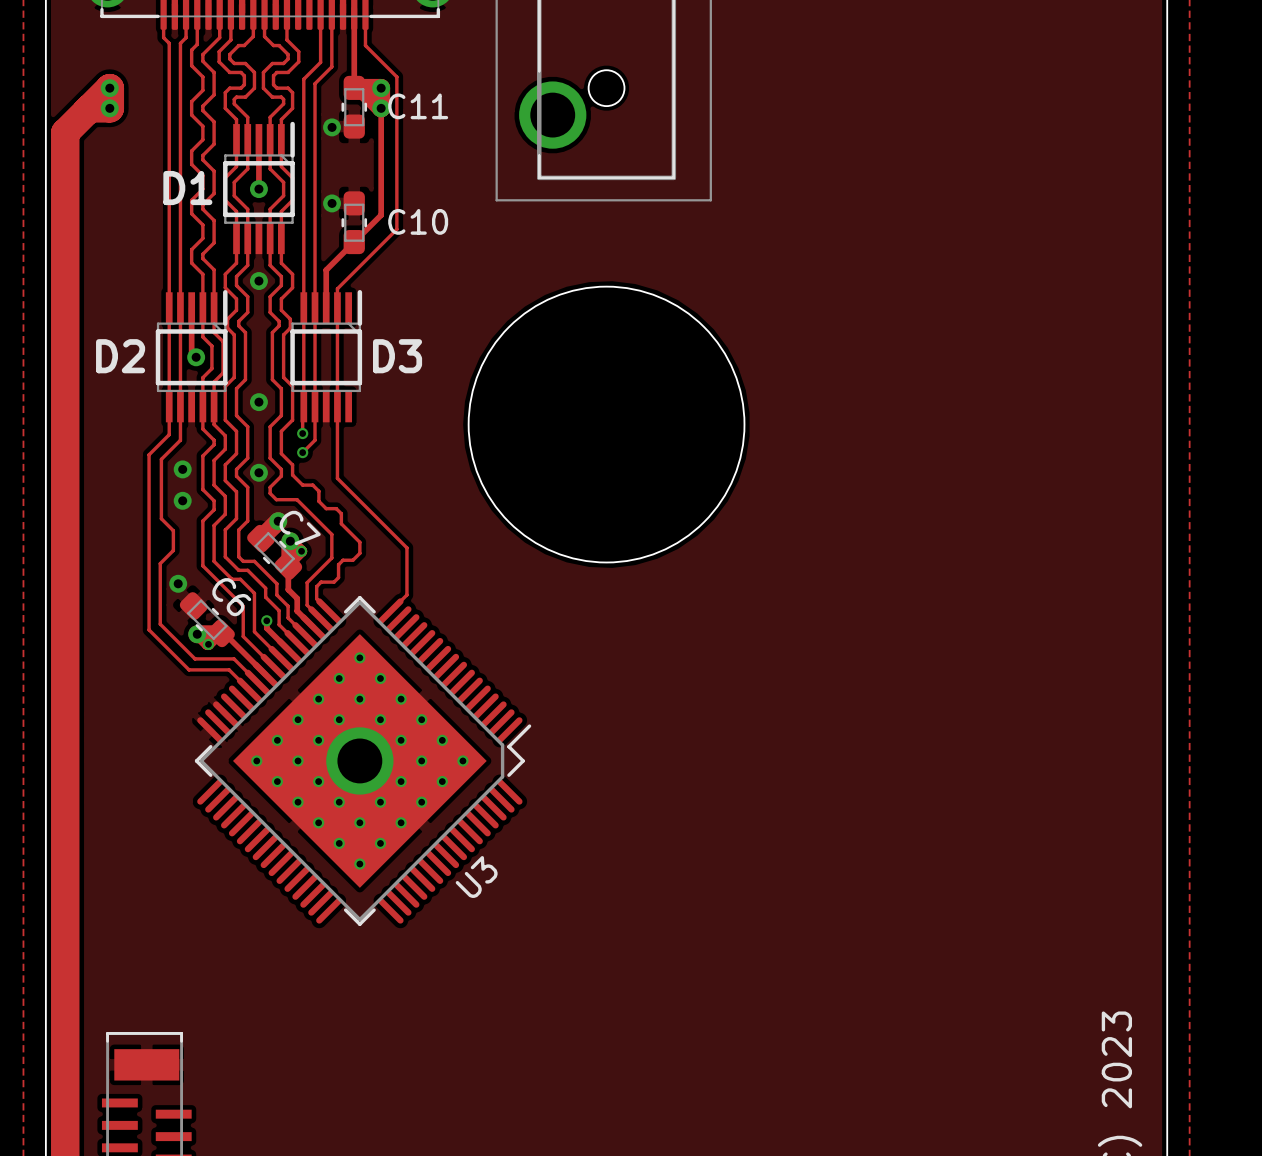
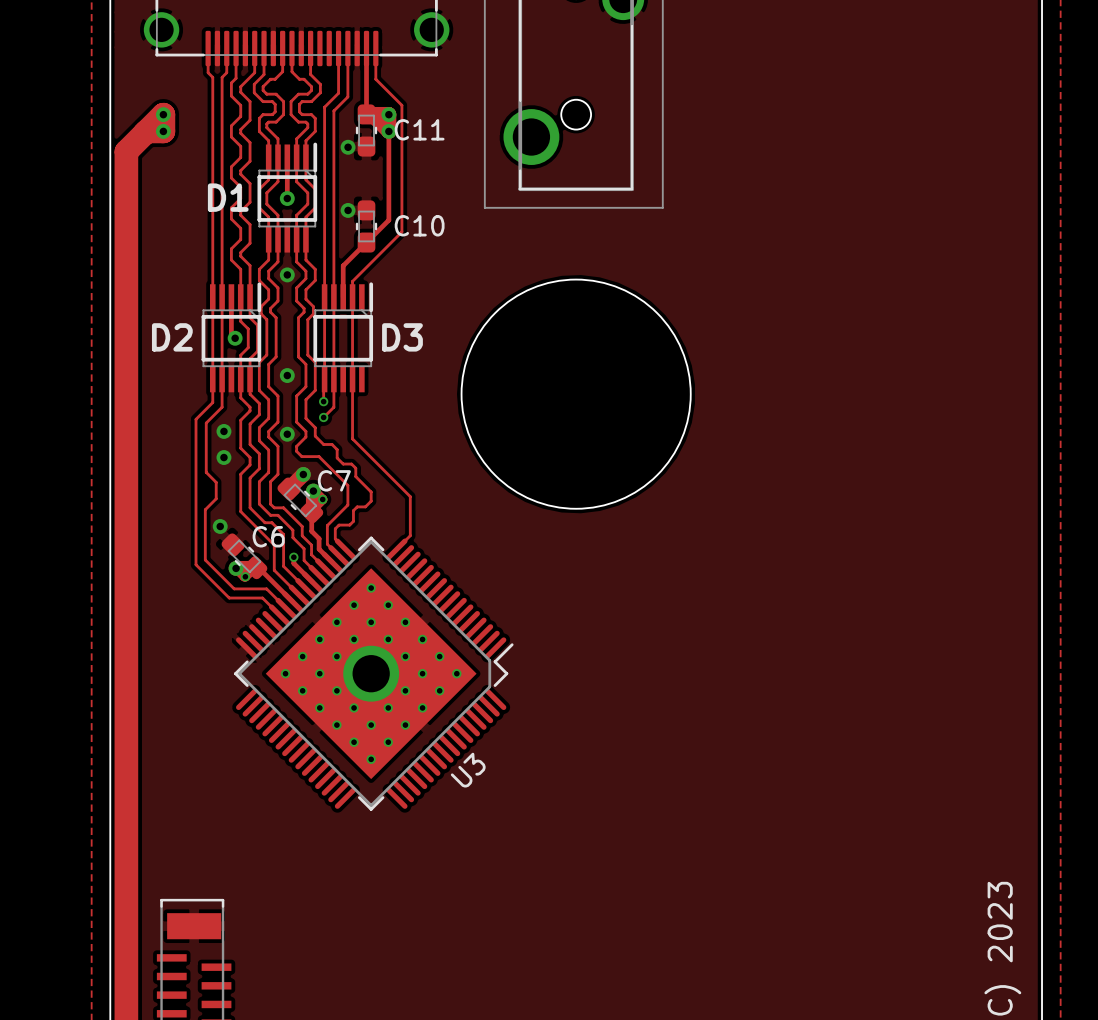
C7 name rotation: 0° (300, 527) -> 45° counterclockwise (334, 480)
C6 name rotation: 0° (231, 597) -> 45° counterclockwise (268, 536)

